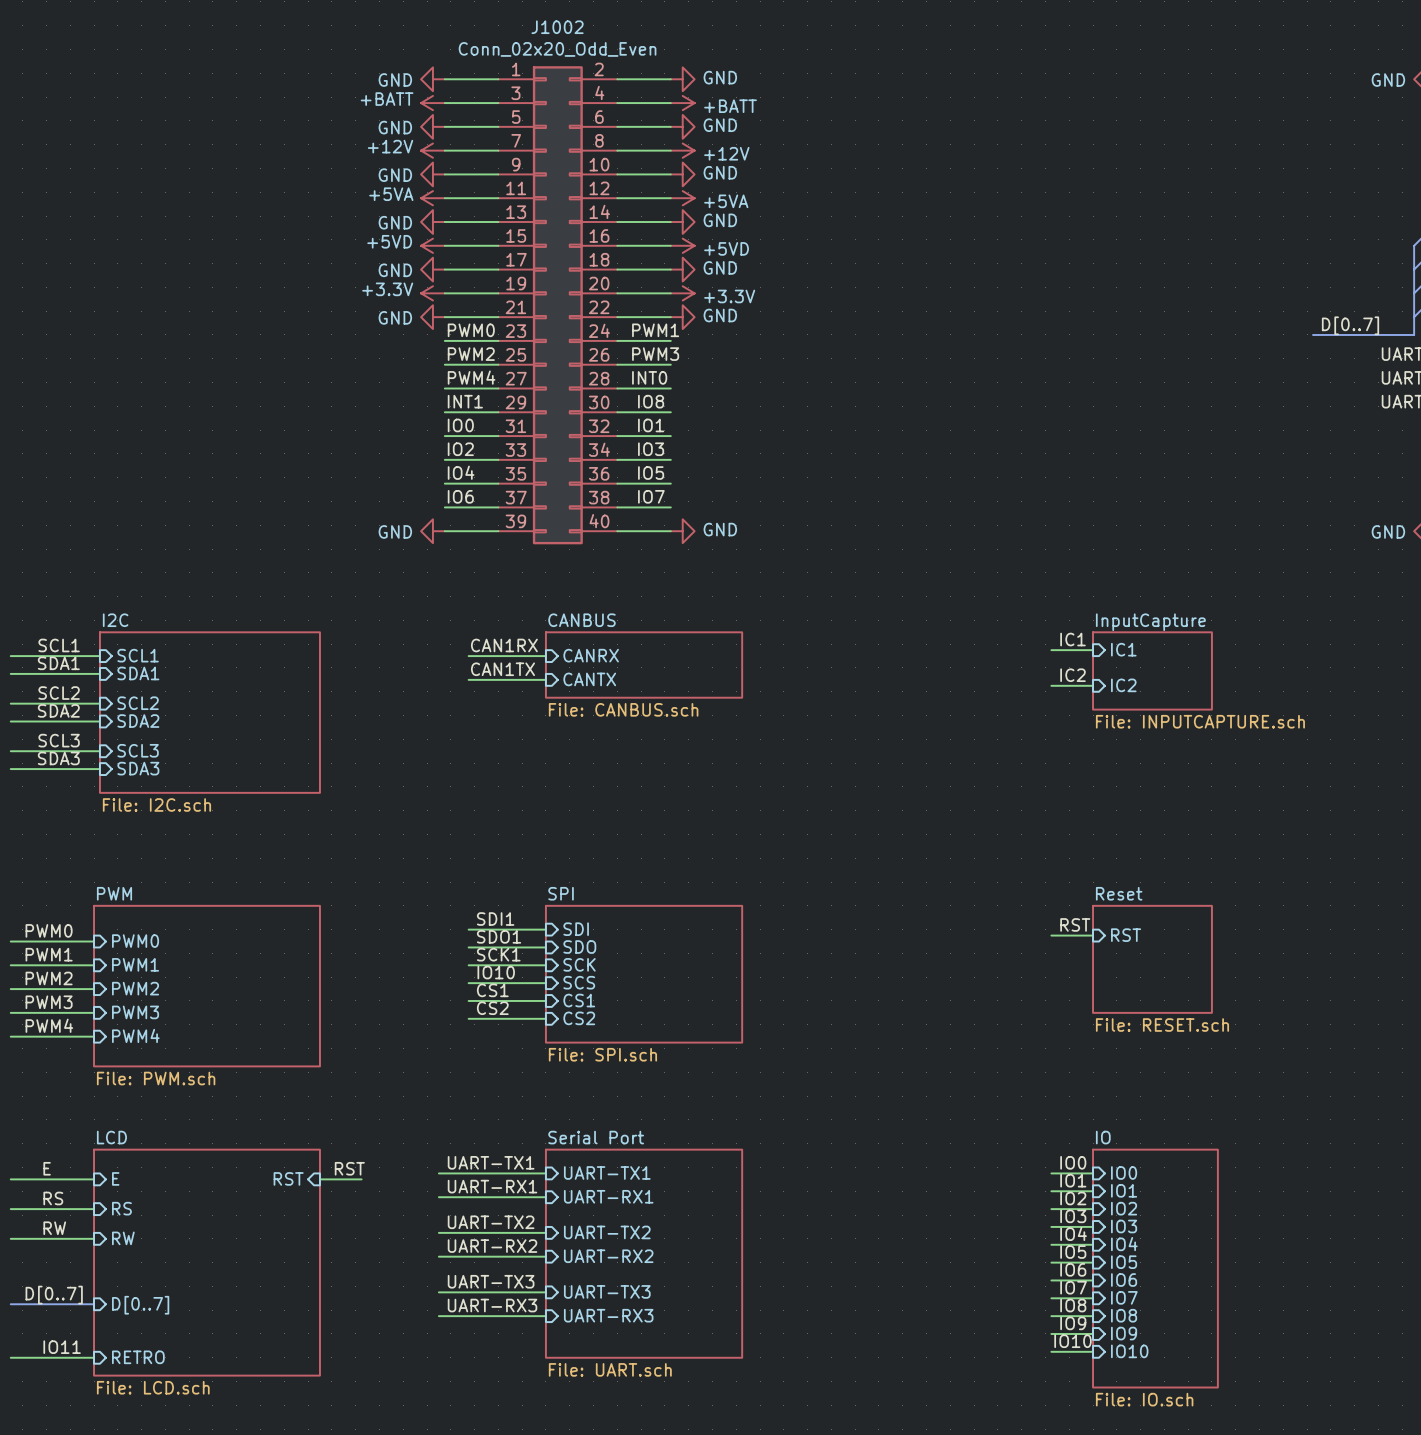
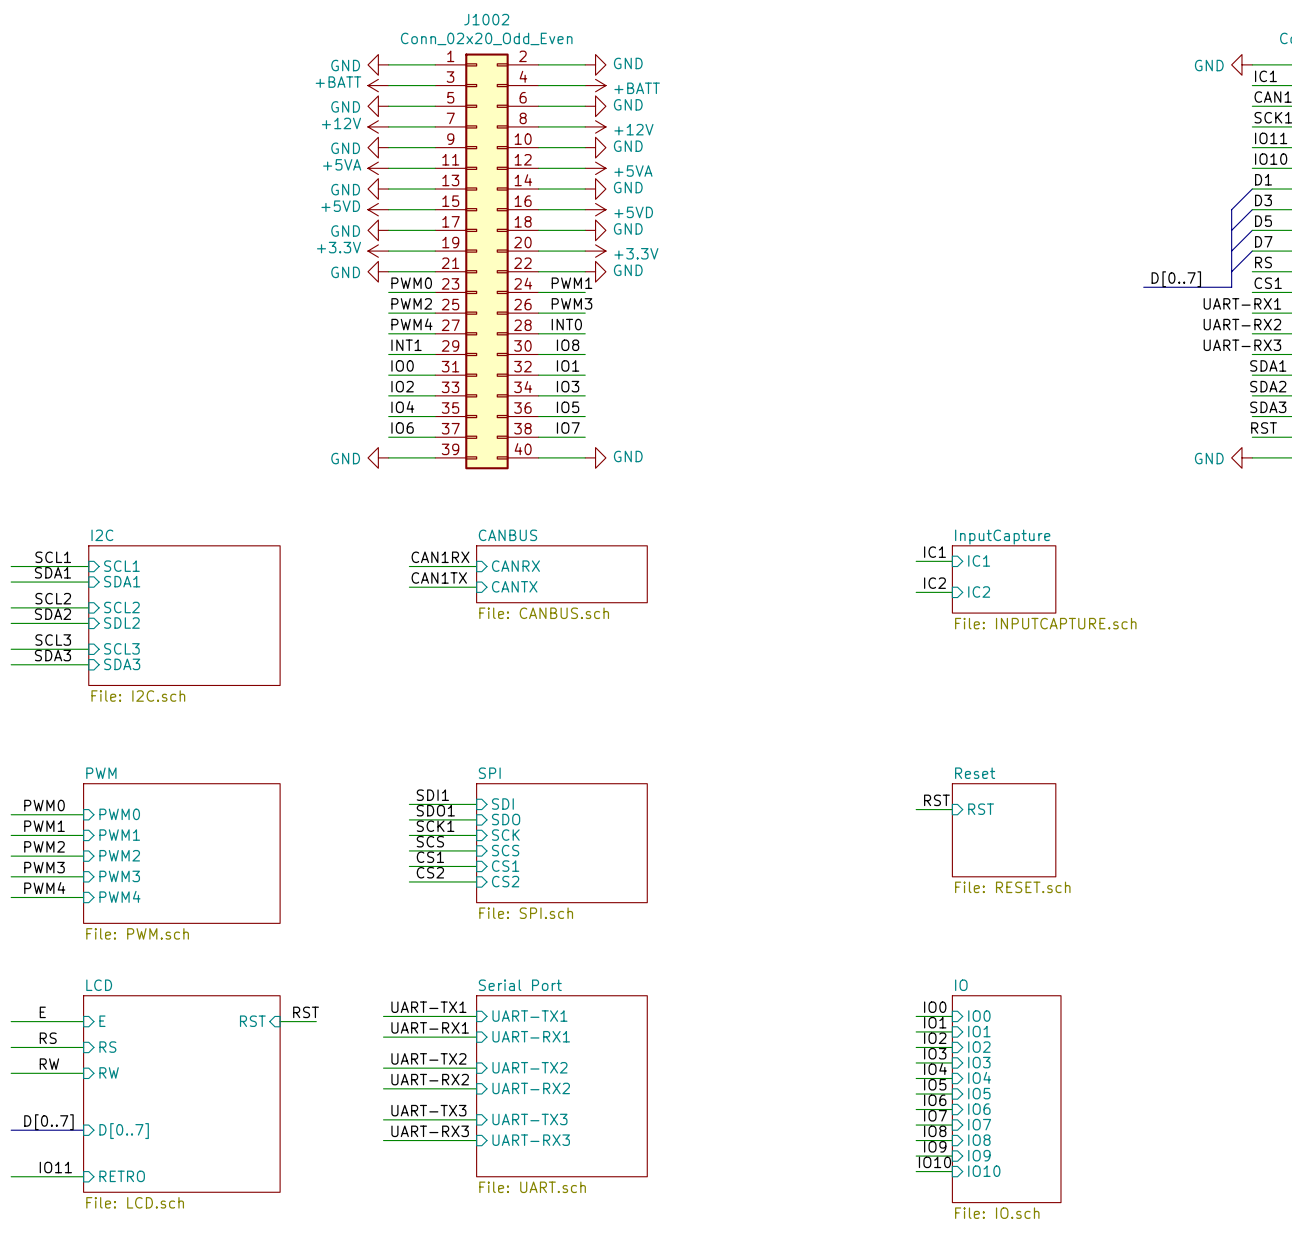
sheet pin: SDA2 (138, 721) -> SDL2 (121, 623)
label: IO10 (496, 972) -> SCS (430, 841)

